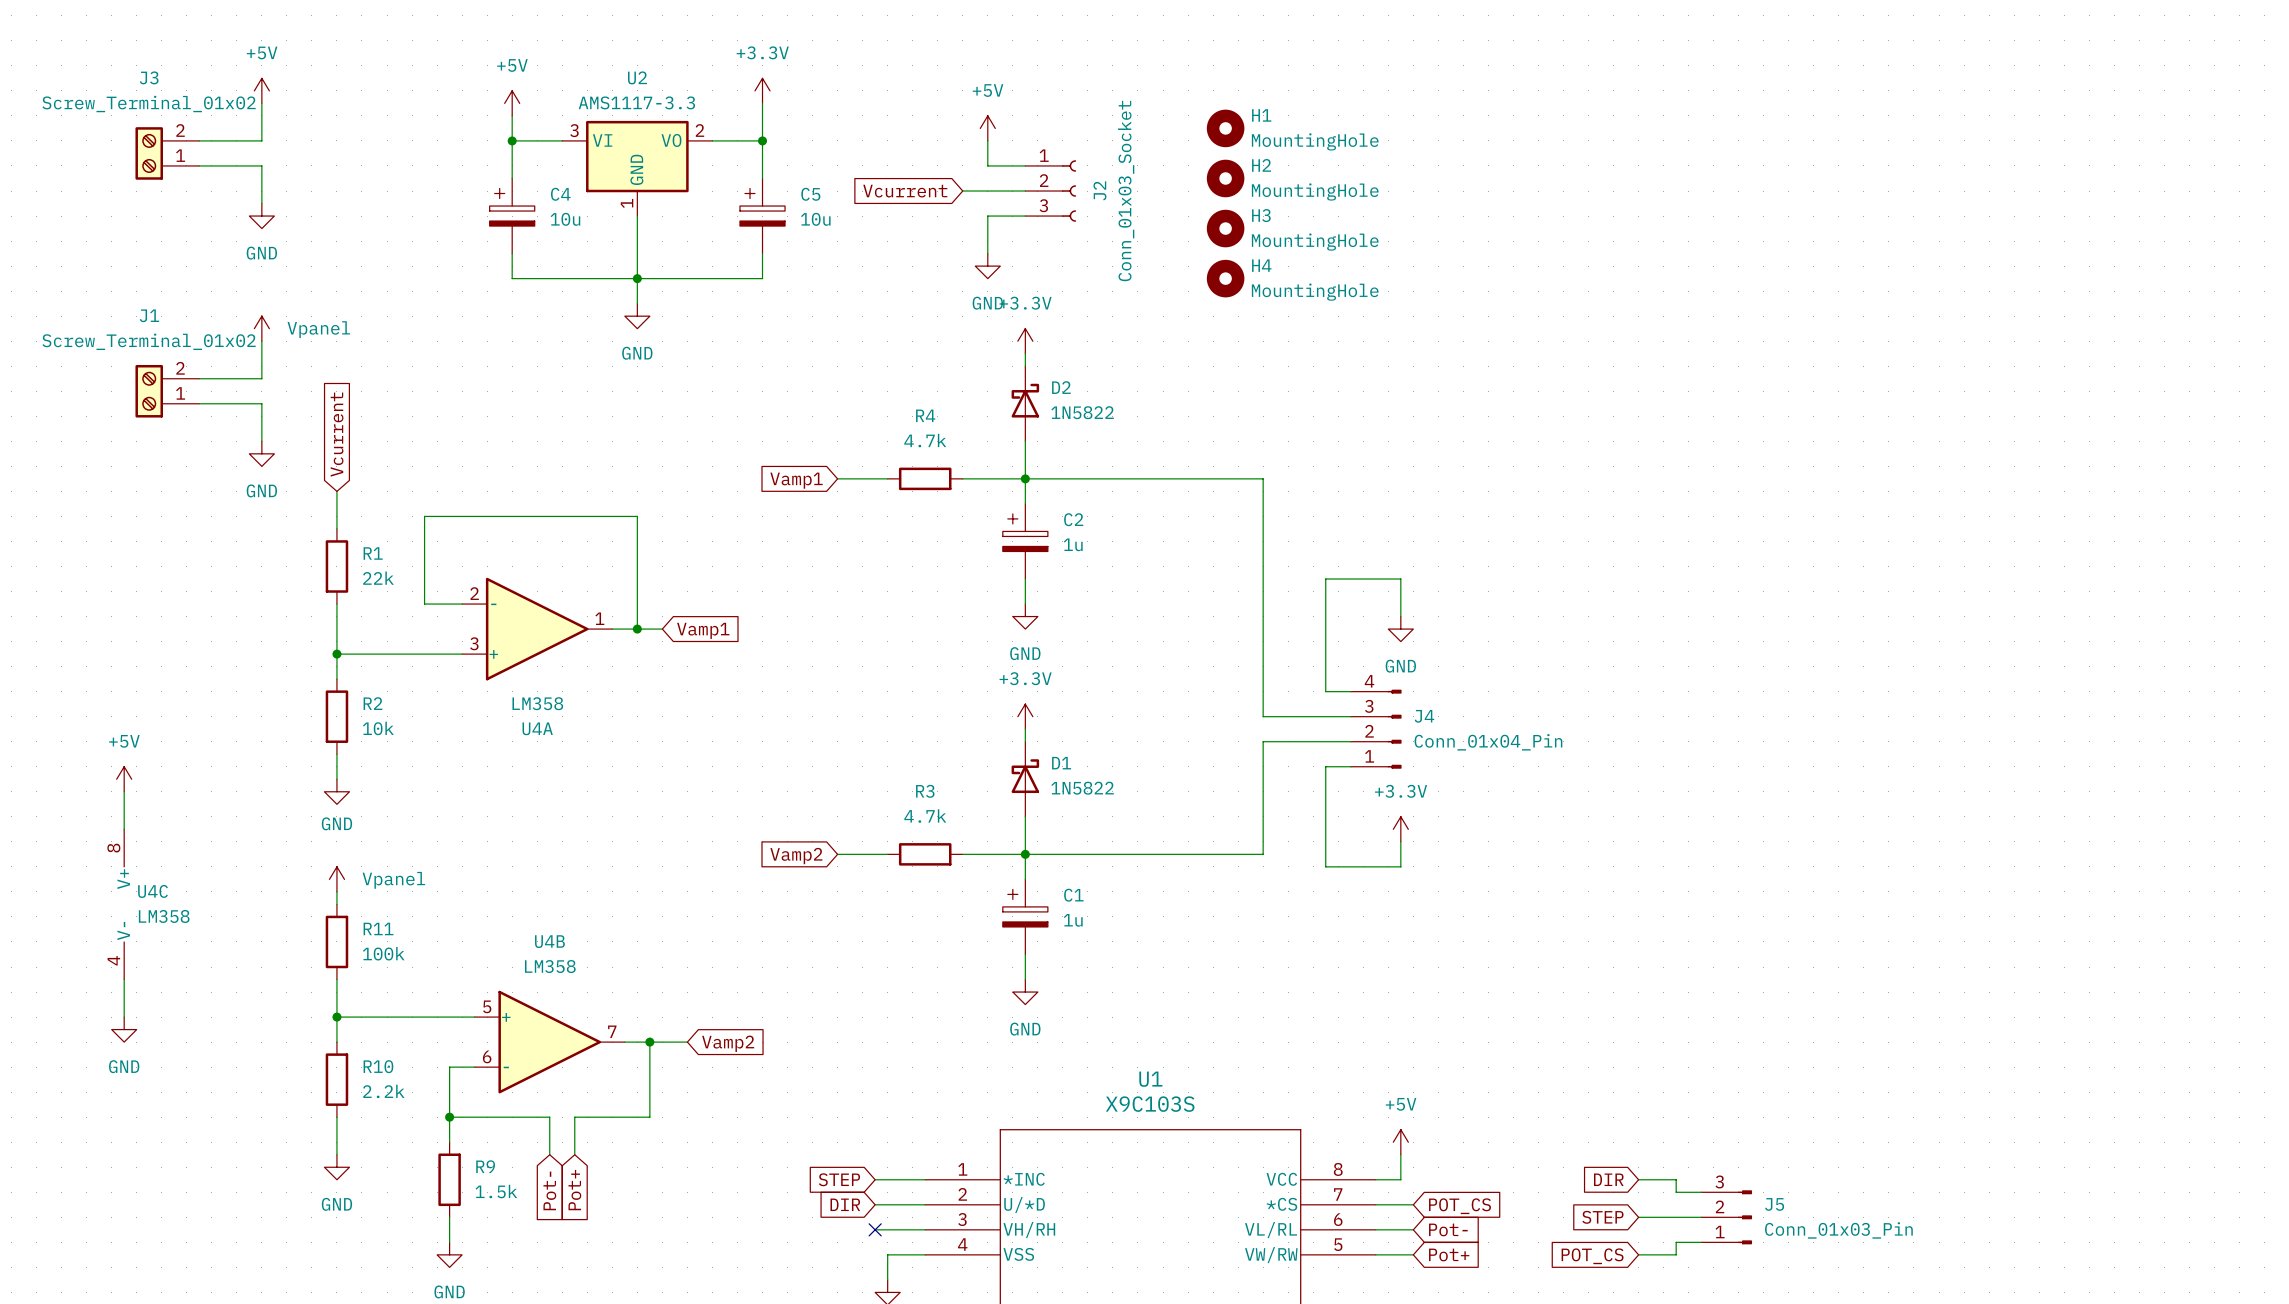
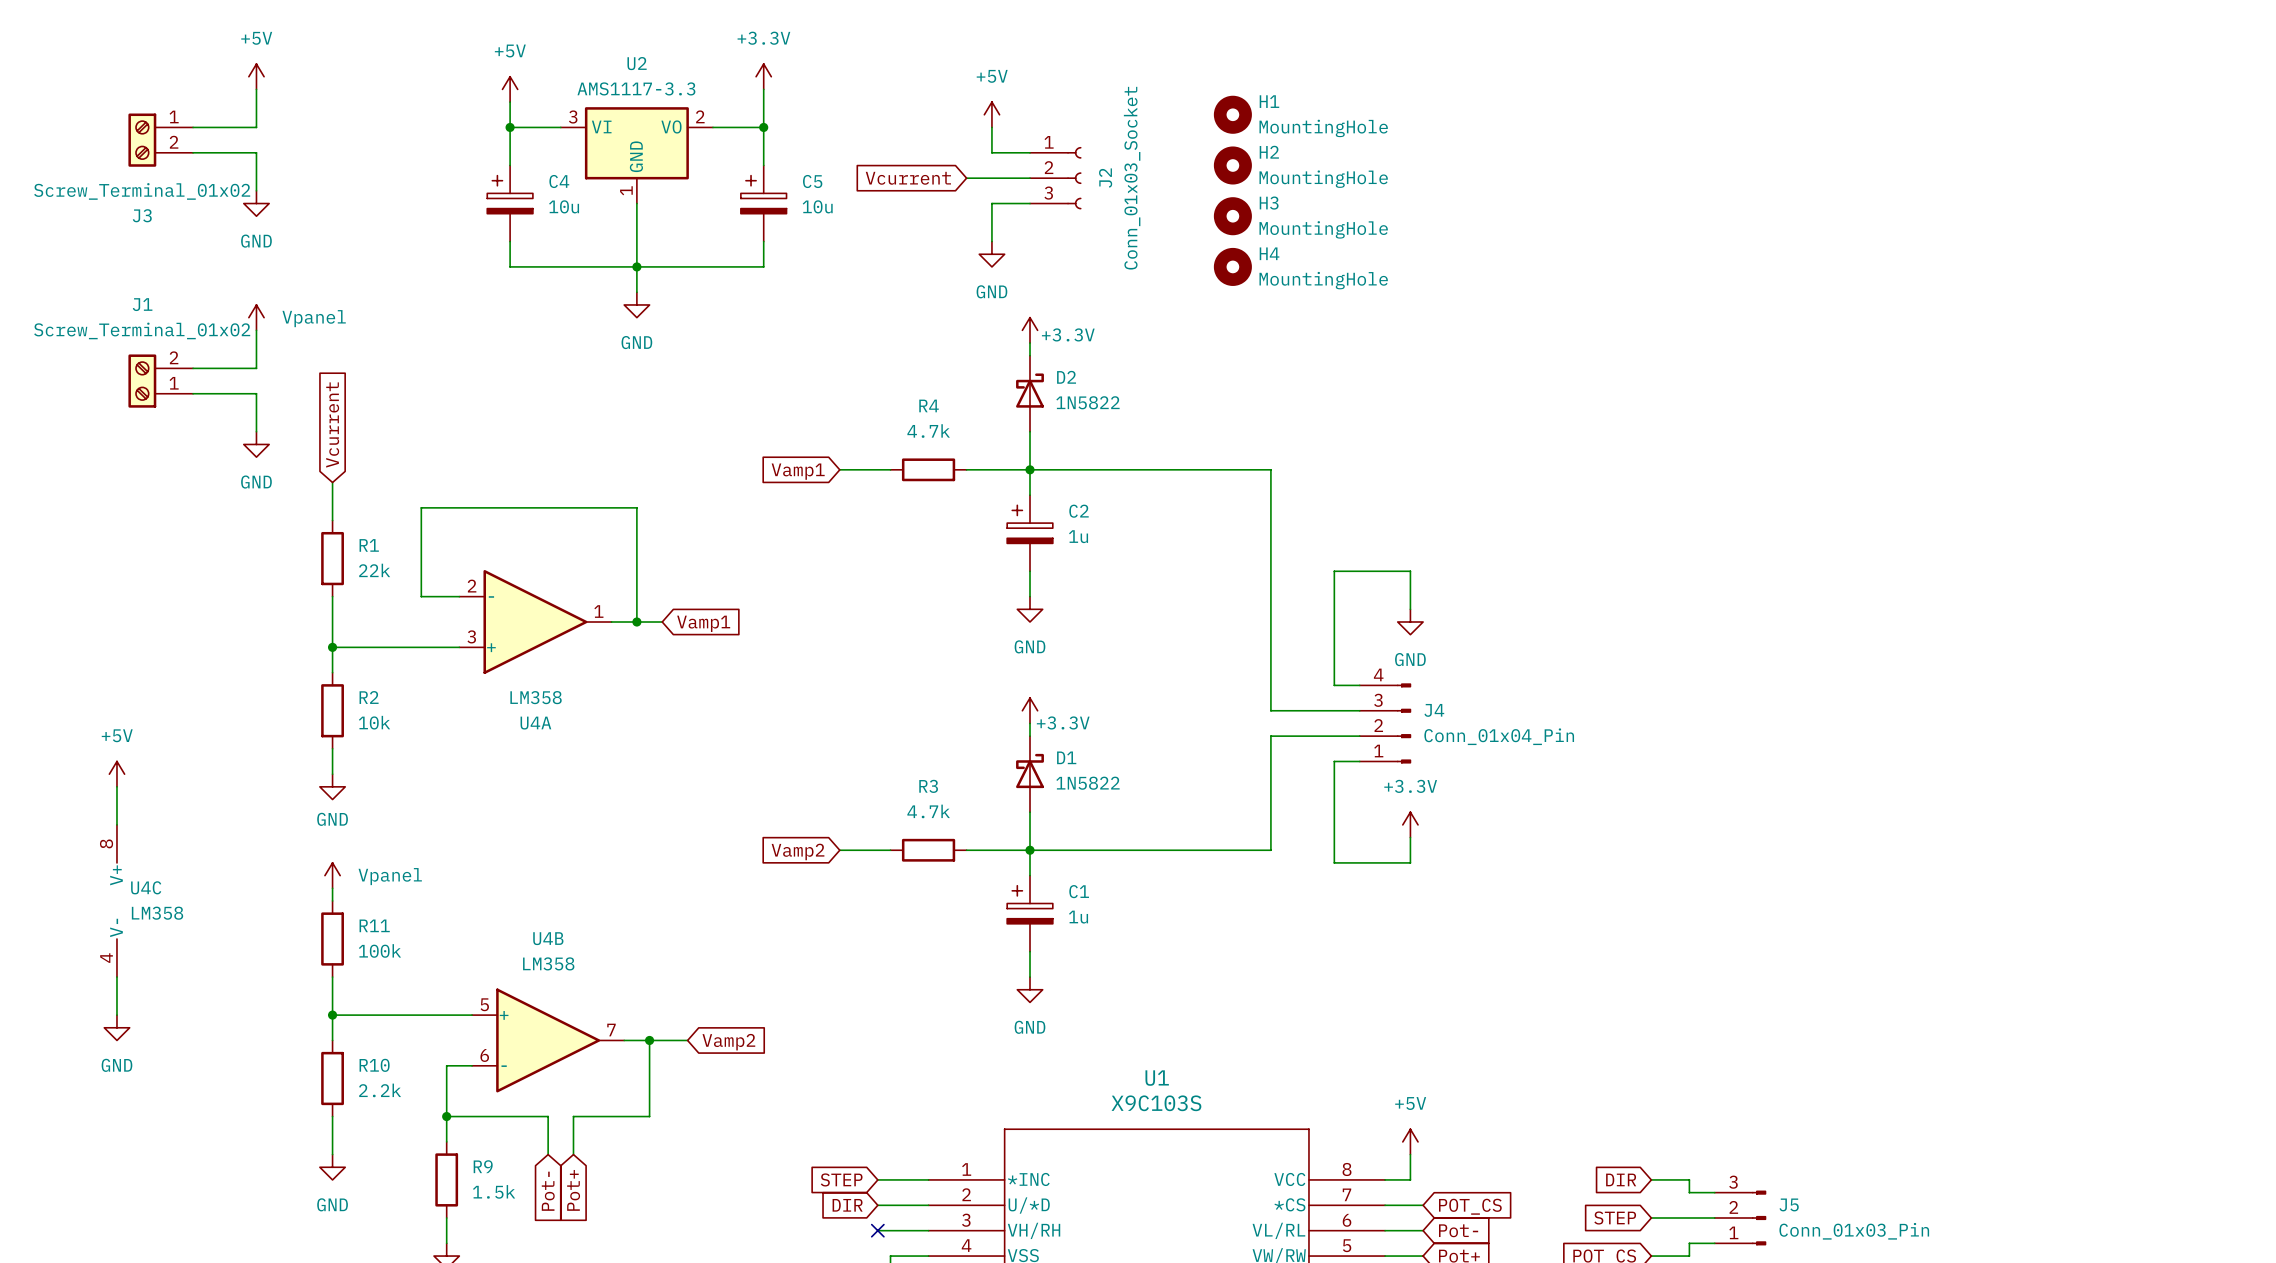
J3 flip: as is (149, 153) -> up-down (142, 140)
power symbol text position: +3.3V (1025, 303) -> +3.3V (1068, 334)
power symbol text position: +3.3V (1025, 678) -> +3.3V (1063, 722)

